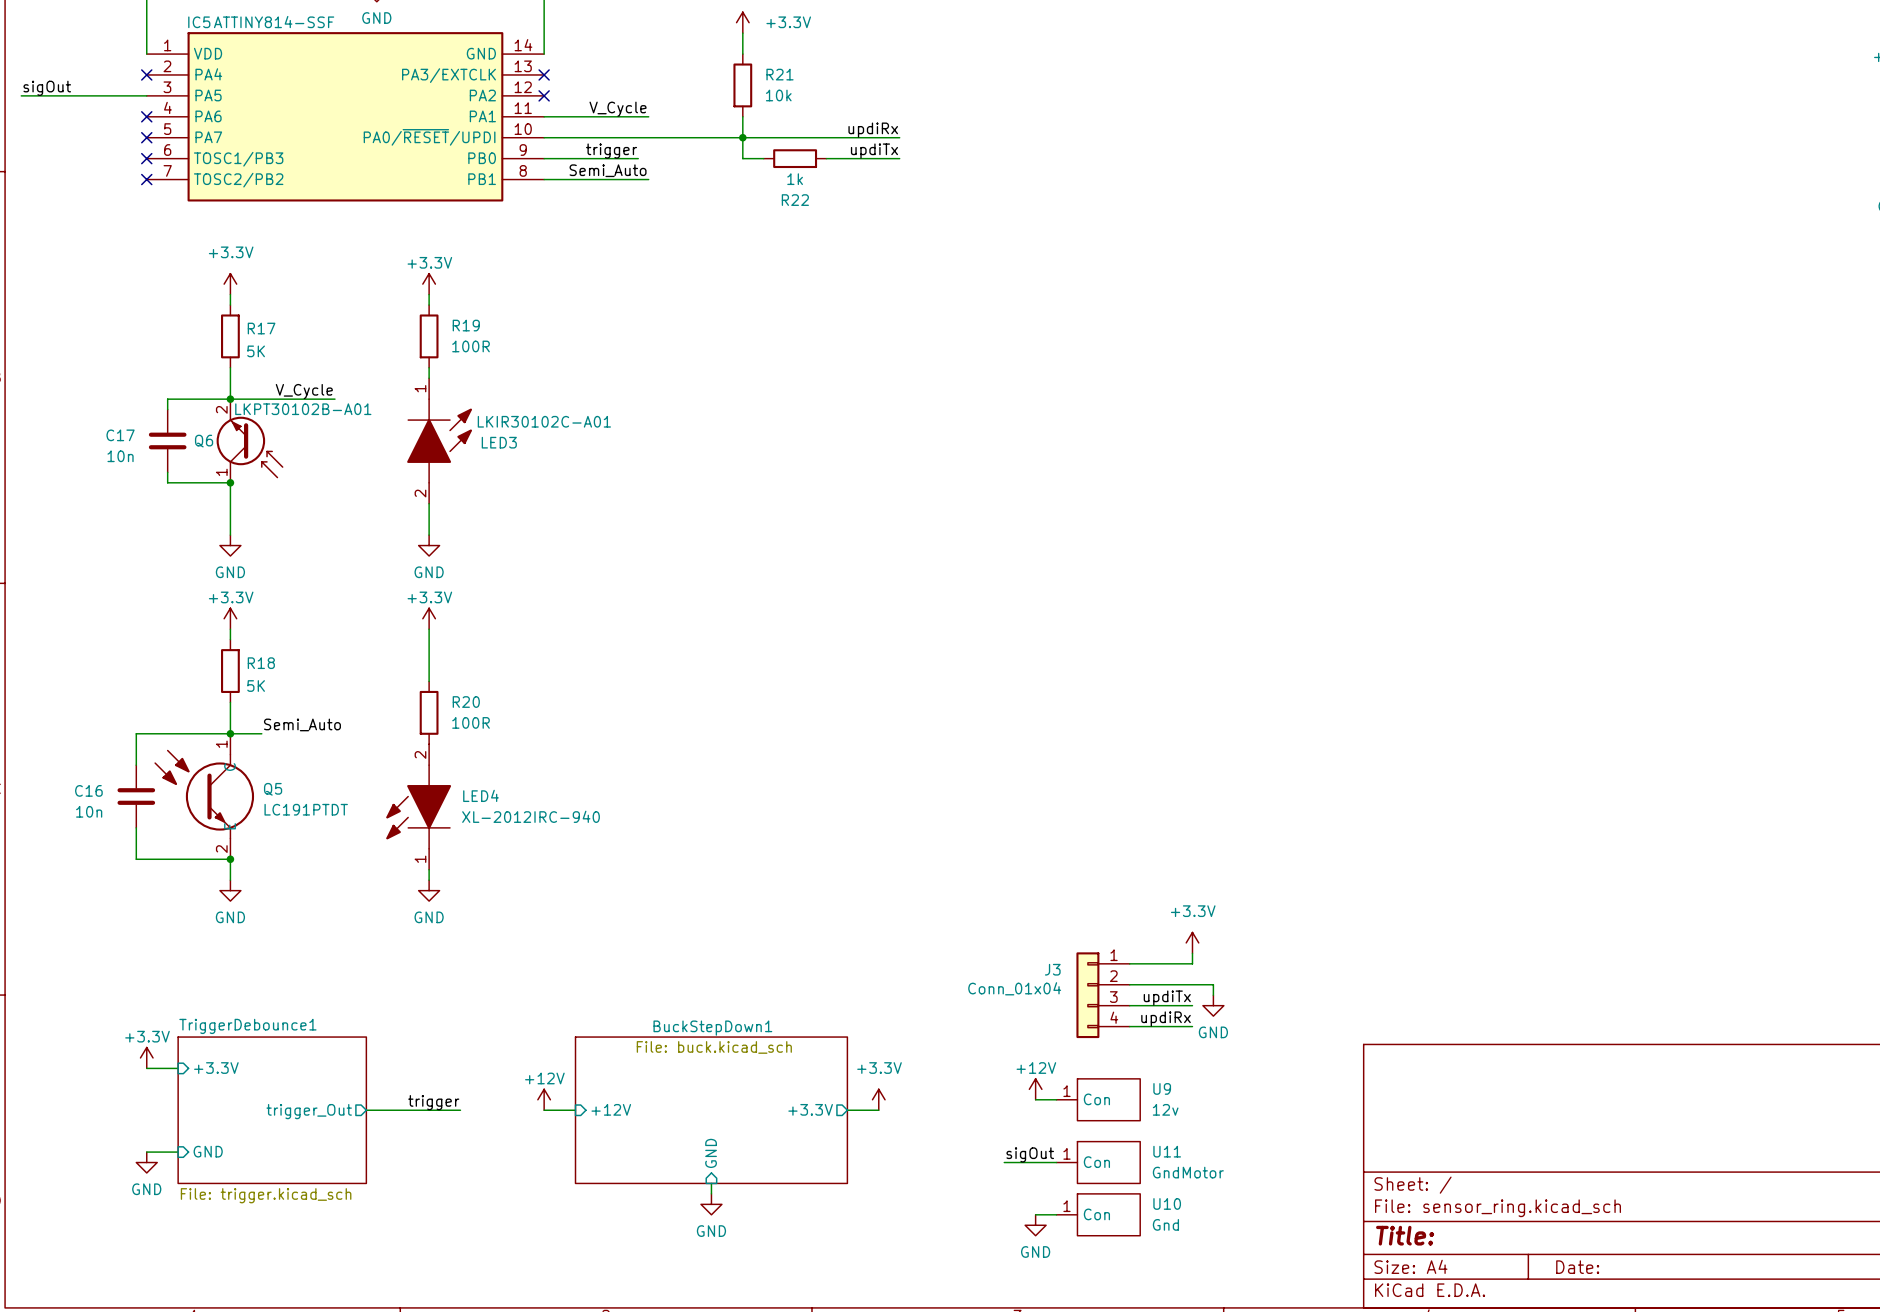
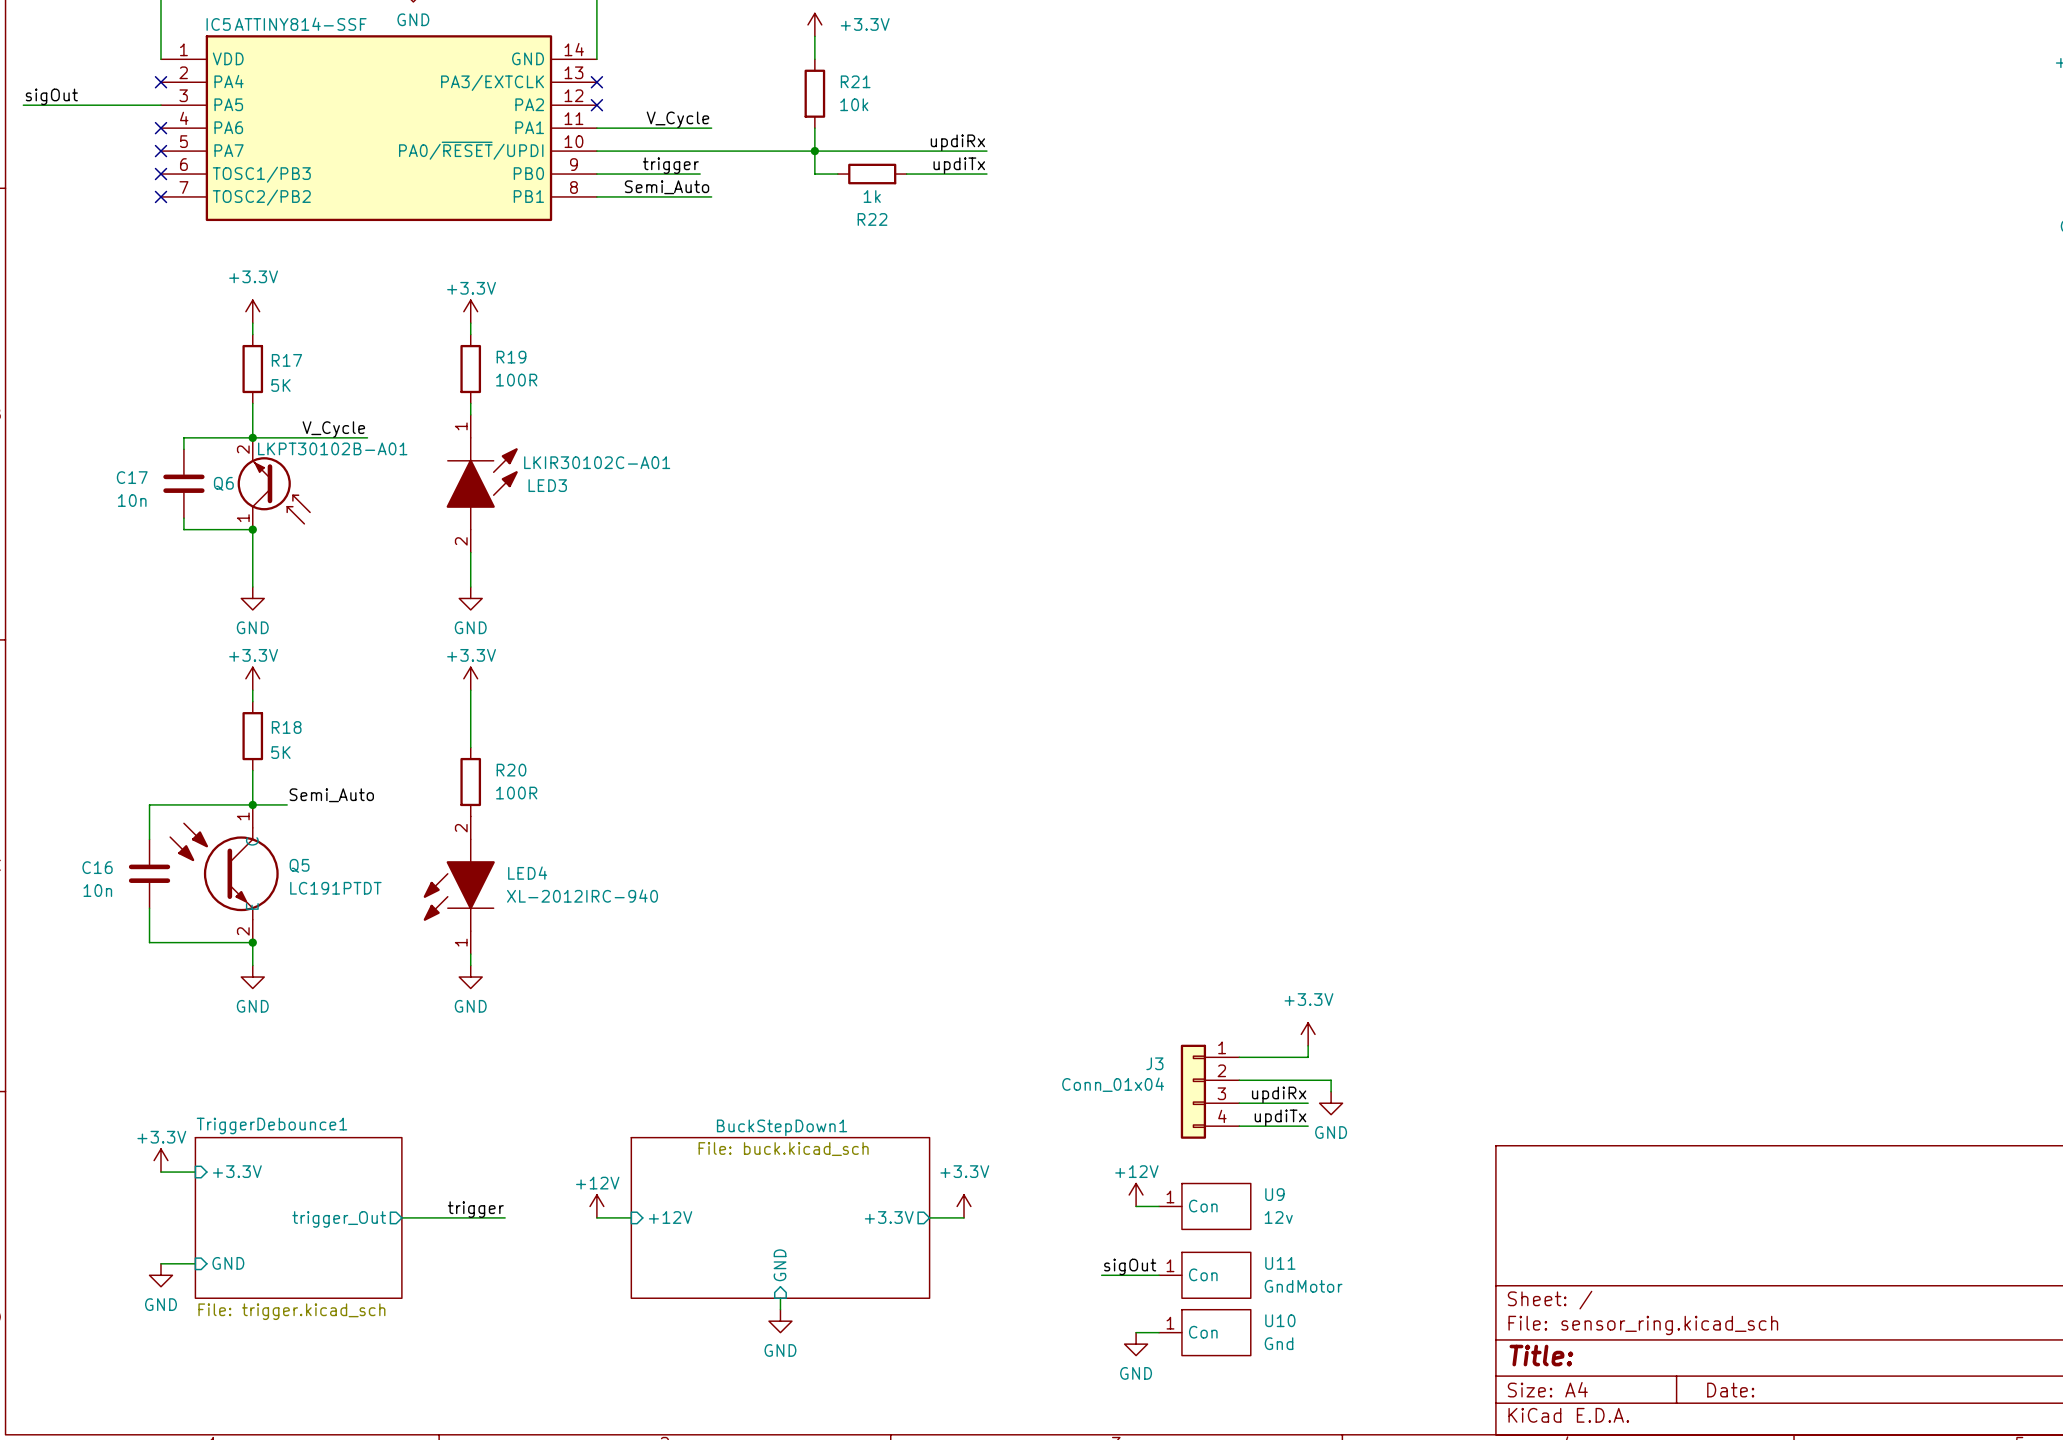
label: updiTx (1167, 998) -> updiRx (1279, 1094)
label: updiRx (1166, 1018) -> updiTx (1280, 1117)

